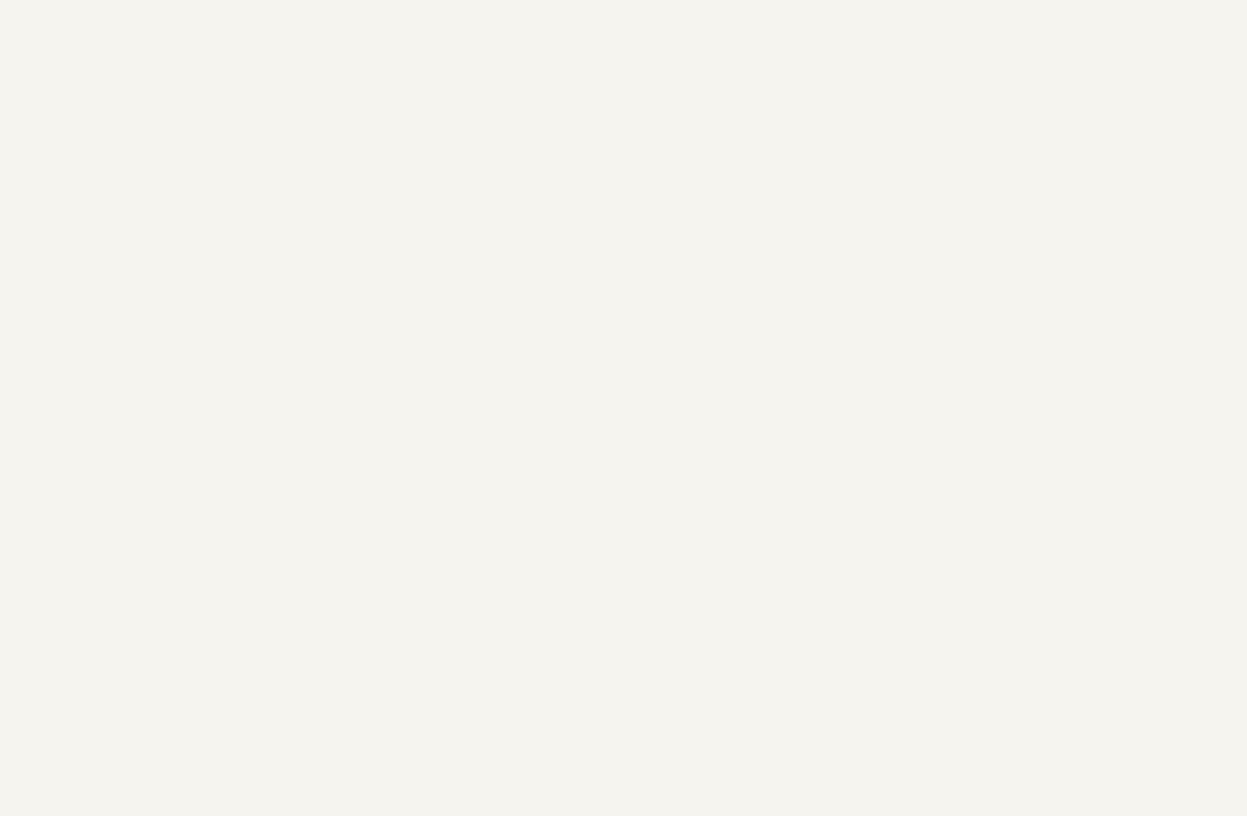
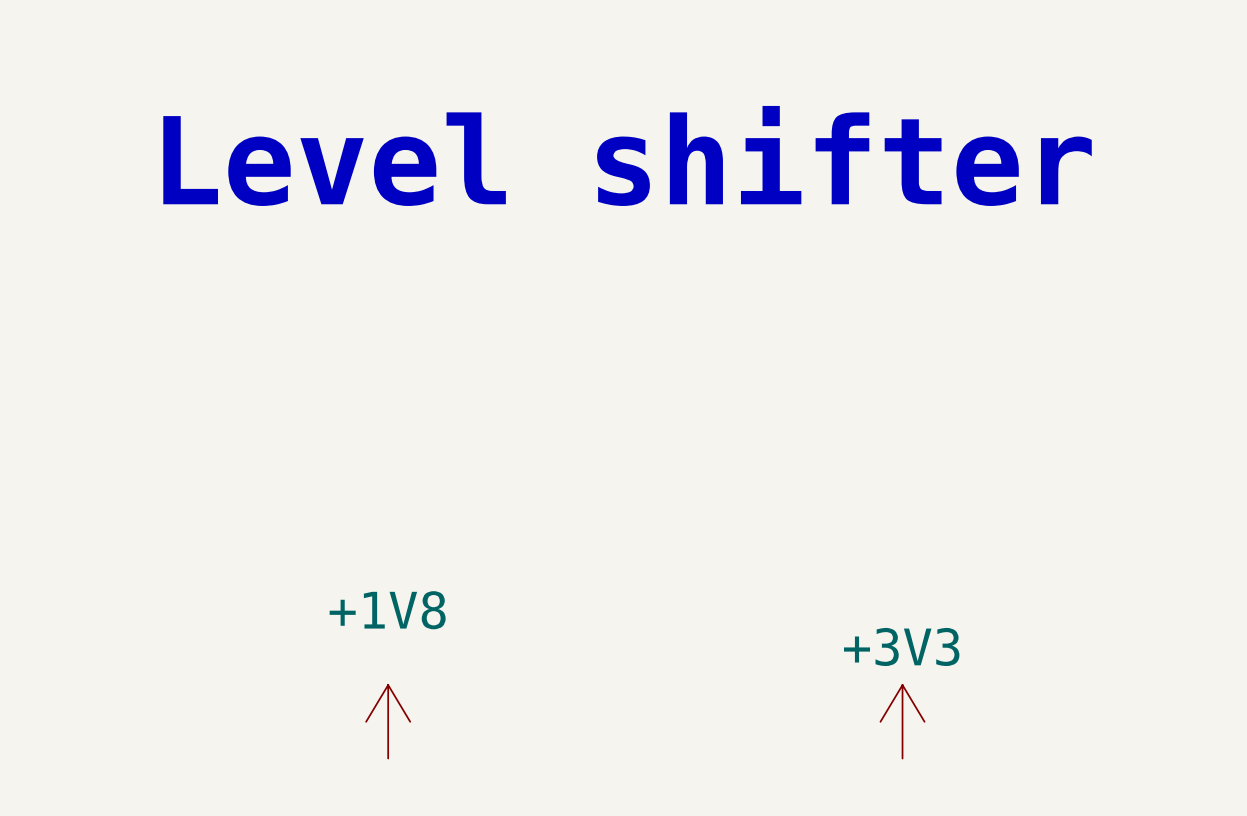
text: none -> Level shifter (627, 155)
power symbol: none -> +1V8 (388, 721)
power symbol: none -> +3V3 (902, 721)

